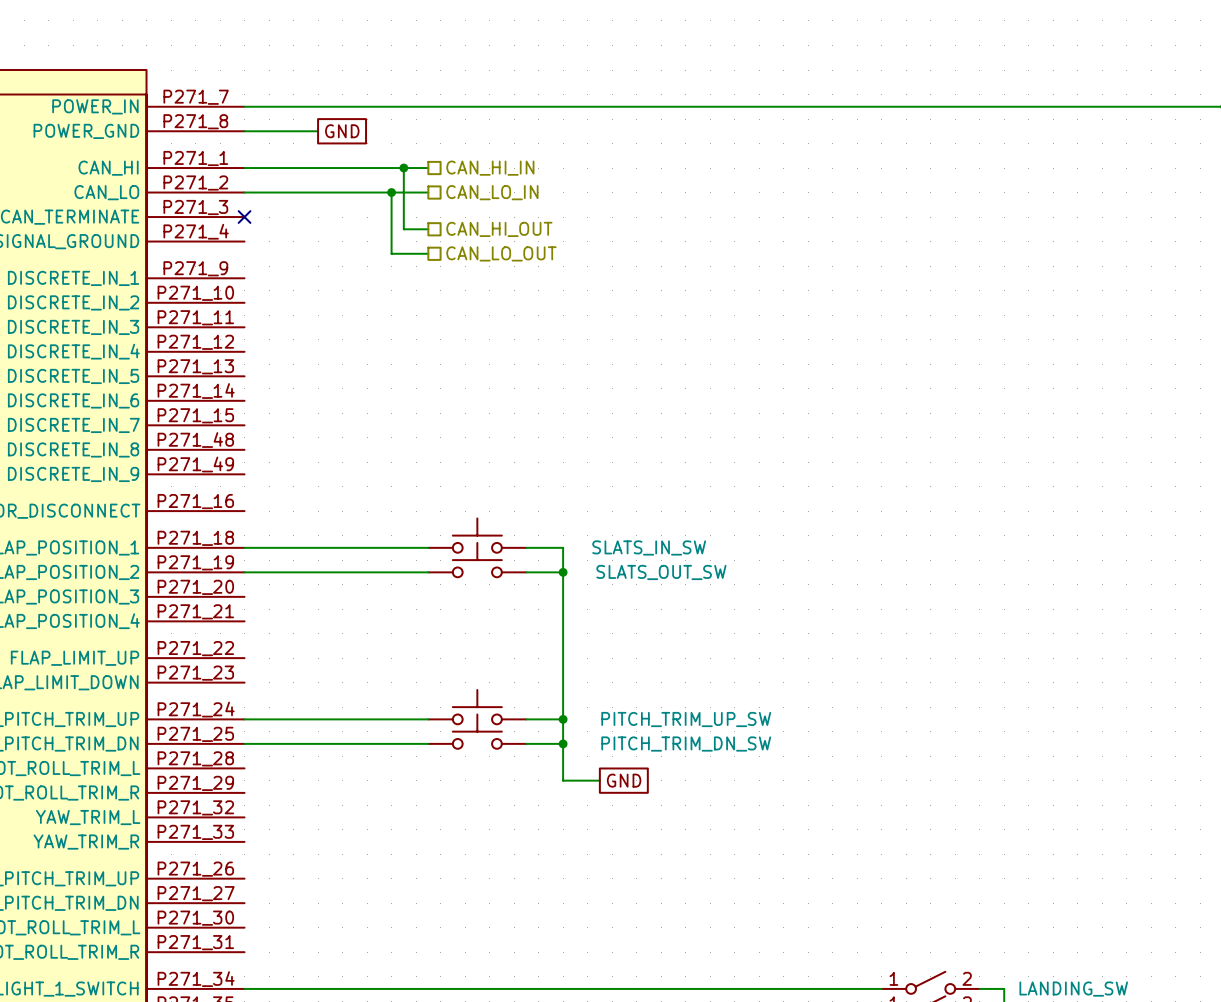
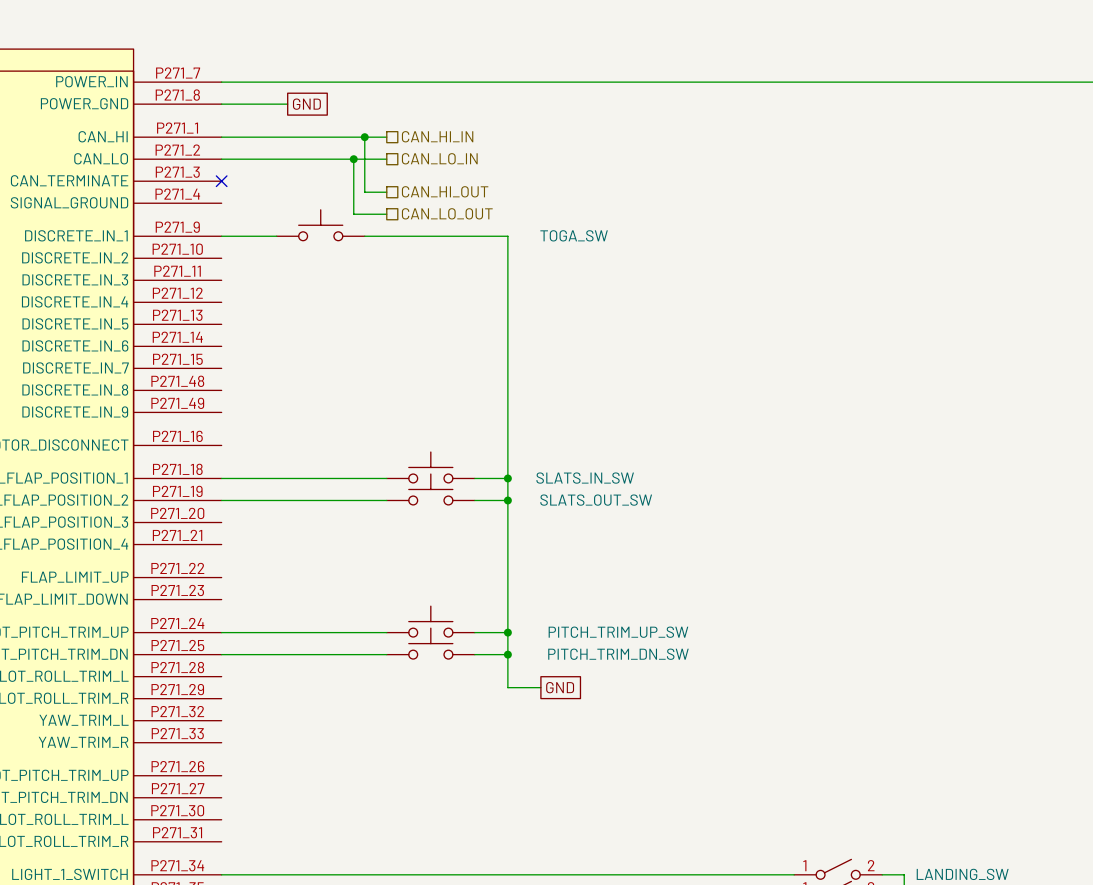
TOGA_SW: none -> (320, 225)
wire: none -> (221, 236) (276, 236)
wire: none -> (364, 236) (507, 236) (507, 478)
junction: none -> (507, 478)

